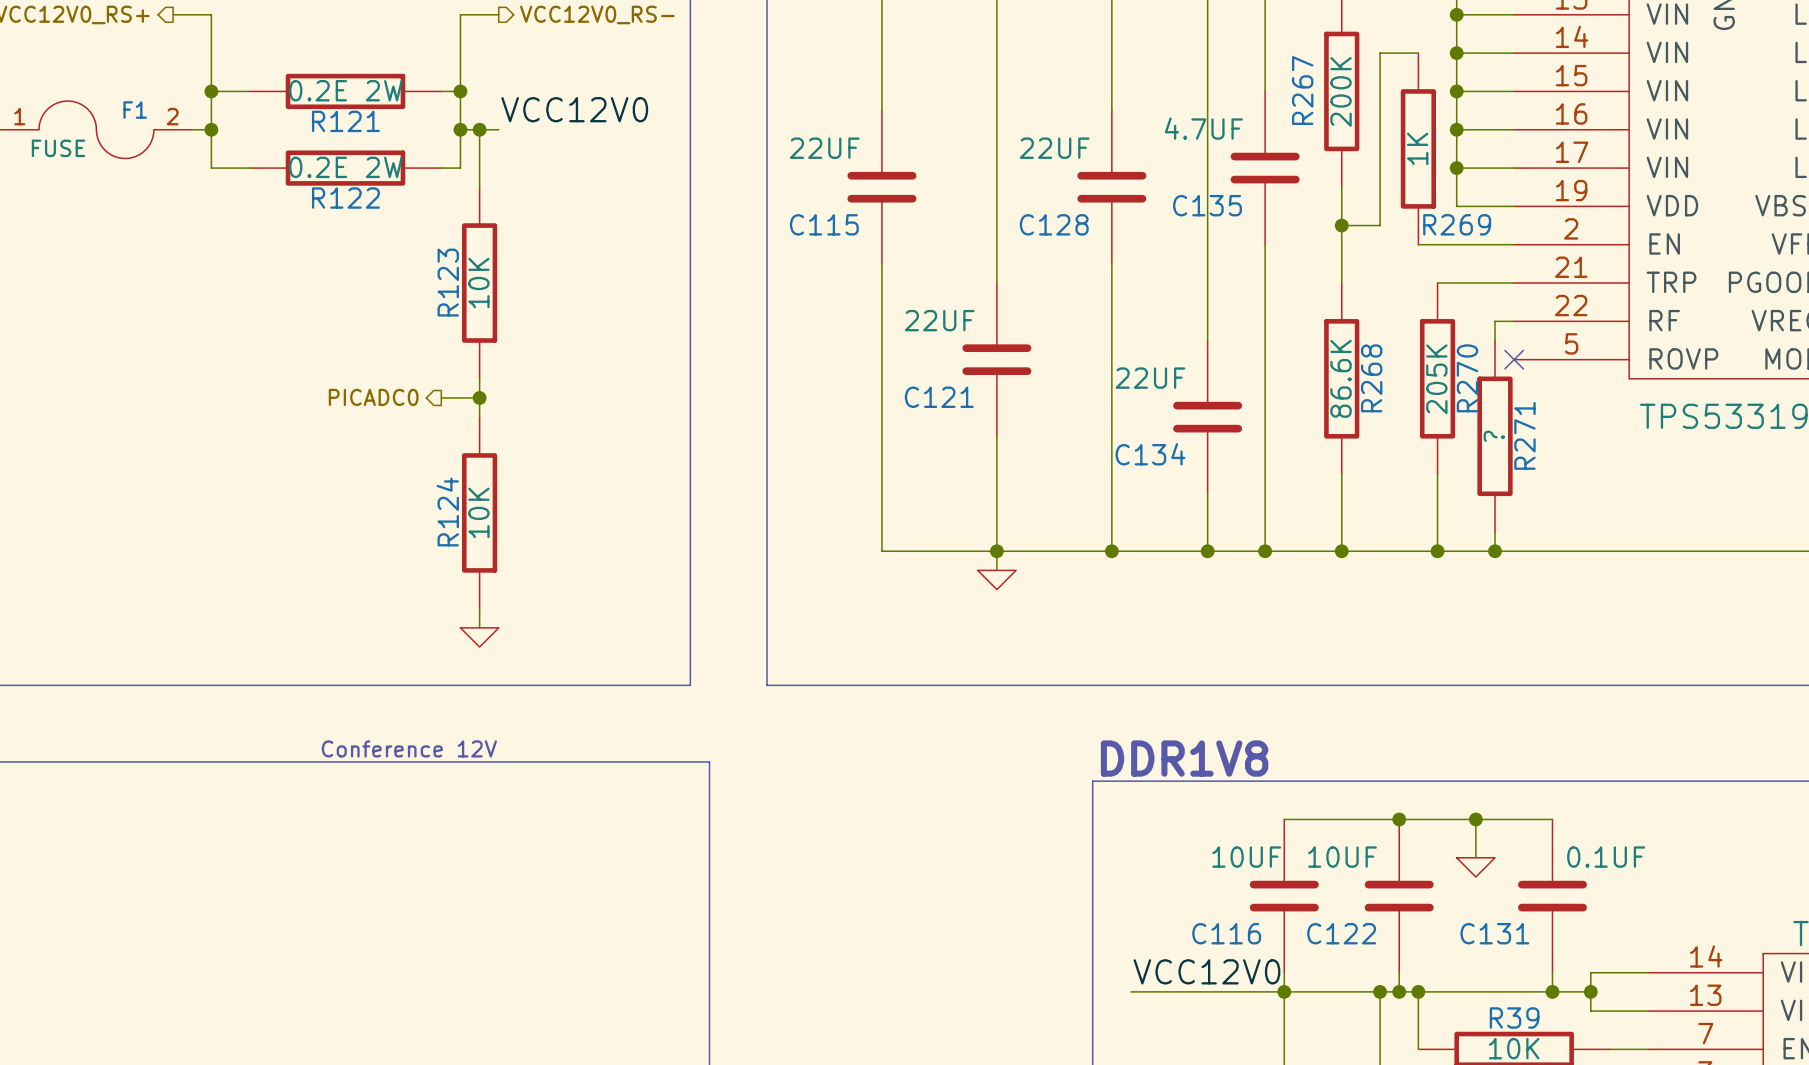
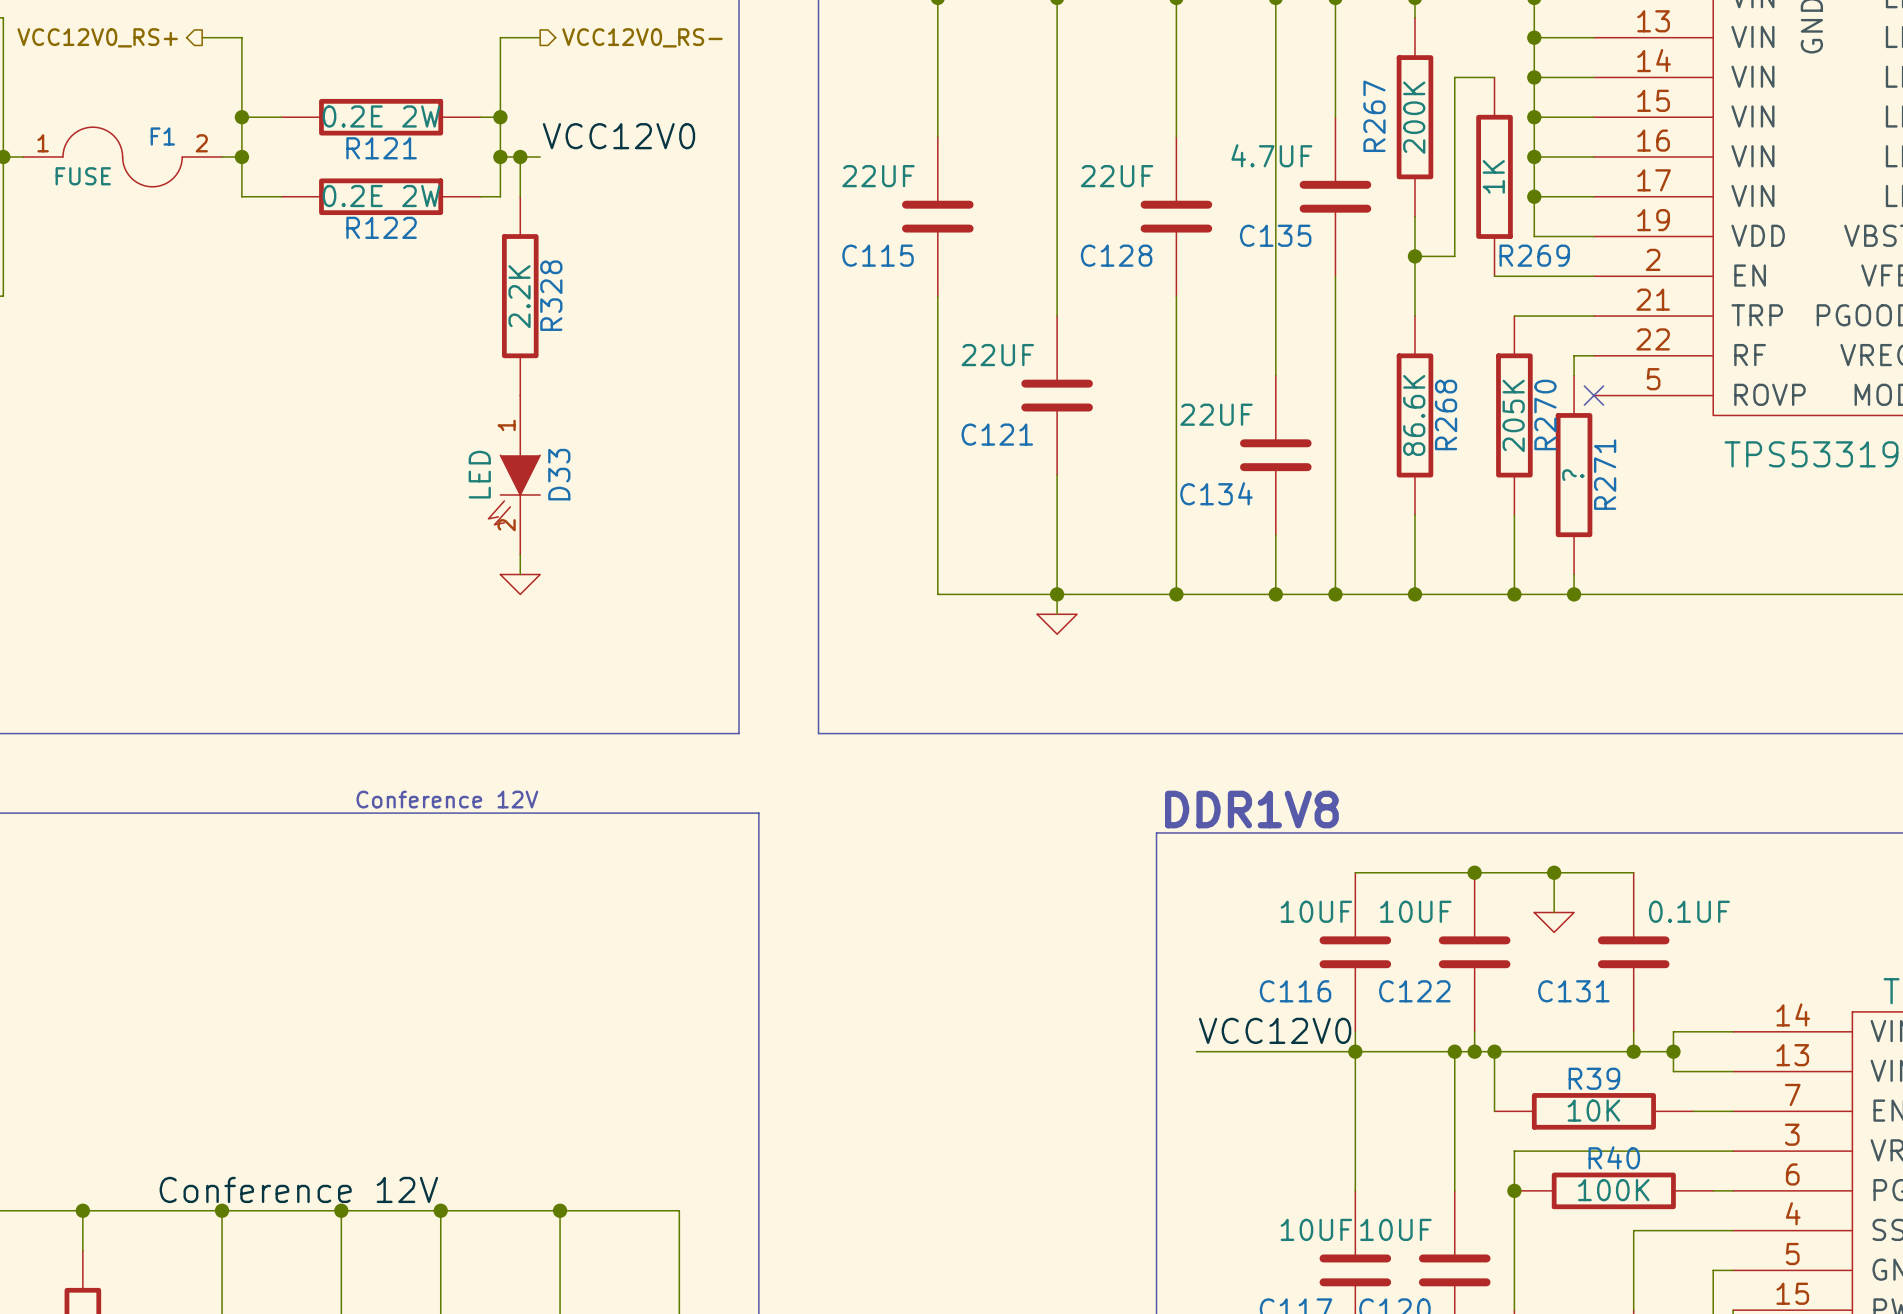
R328: none -> 2.2K (520, 296)
R123: 10K (479, 283) -> none
hierarchical label: PICADC0 (373, 397) -> none
wire: (441, 397) (479, 397) -> none
junction: (479, 397) -> none
D33: none -> LED (514, 475)
R124: 10K (479, 512) -> none
wire: (479, 608) (479, 627) -> (520, 554) (520, 574)
power symbol position: (479, 637) -> (520, 584)

